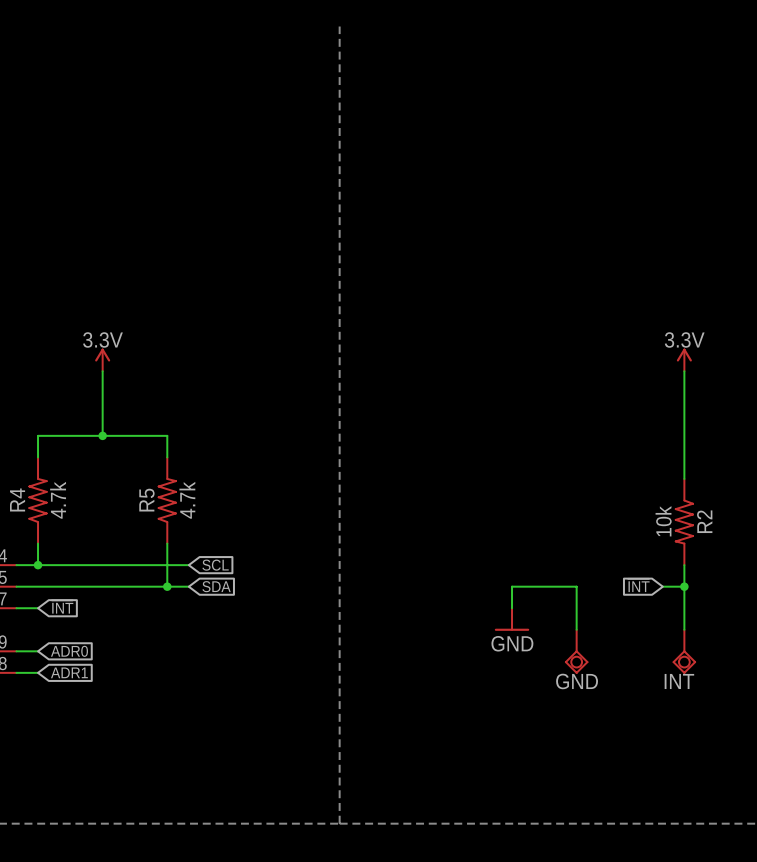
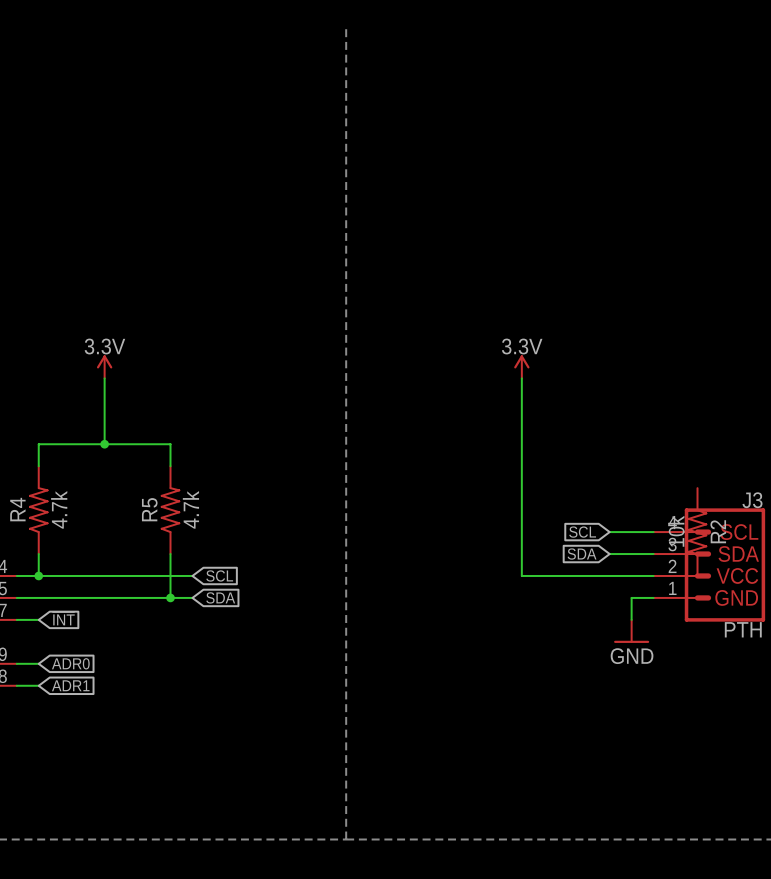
power symbol: none -> 3.3V (521, 366)
power symbol: 3.3V (684, 359) -> none
wire: none -> (521, 378) (521, 575) (653, 575)
wire: (684, 371) (684, 478) -> none
global label: none -> SCL (582, 532)
wire: none -> (609, 532) (653, 532)
global label: none -> SDA (582, 554)
wire: none -> (609, 554) (653, 554)
J3: none -> PTH (709, 565)
wire: (684, 565) (684, 629) -> none
global label: ~{INT} (638, 585) -> none
wire: none -> (653, 597) (631, 597) (631, 619)
junction: (684, 586) -> none
wire: (512, 608) (512, 586) (576, 586) (576, 629) -> none
power symbol position: GND (512, 619) -> GND (631, 631)
GND: (576, 651) -> none
INT: (684, 651) -> none

